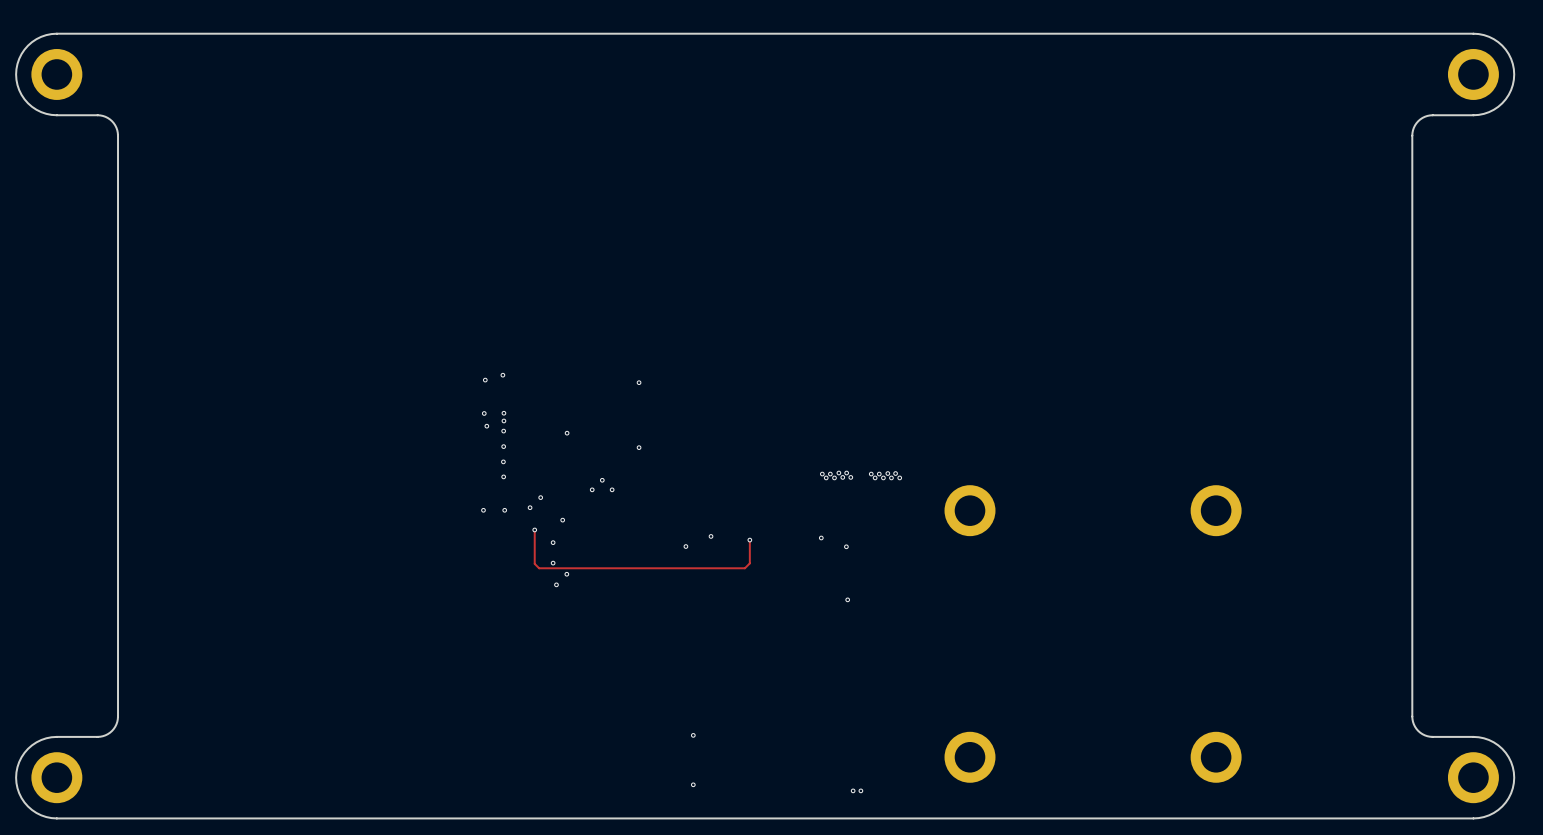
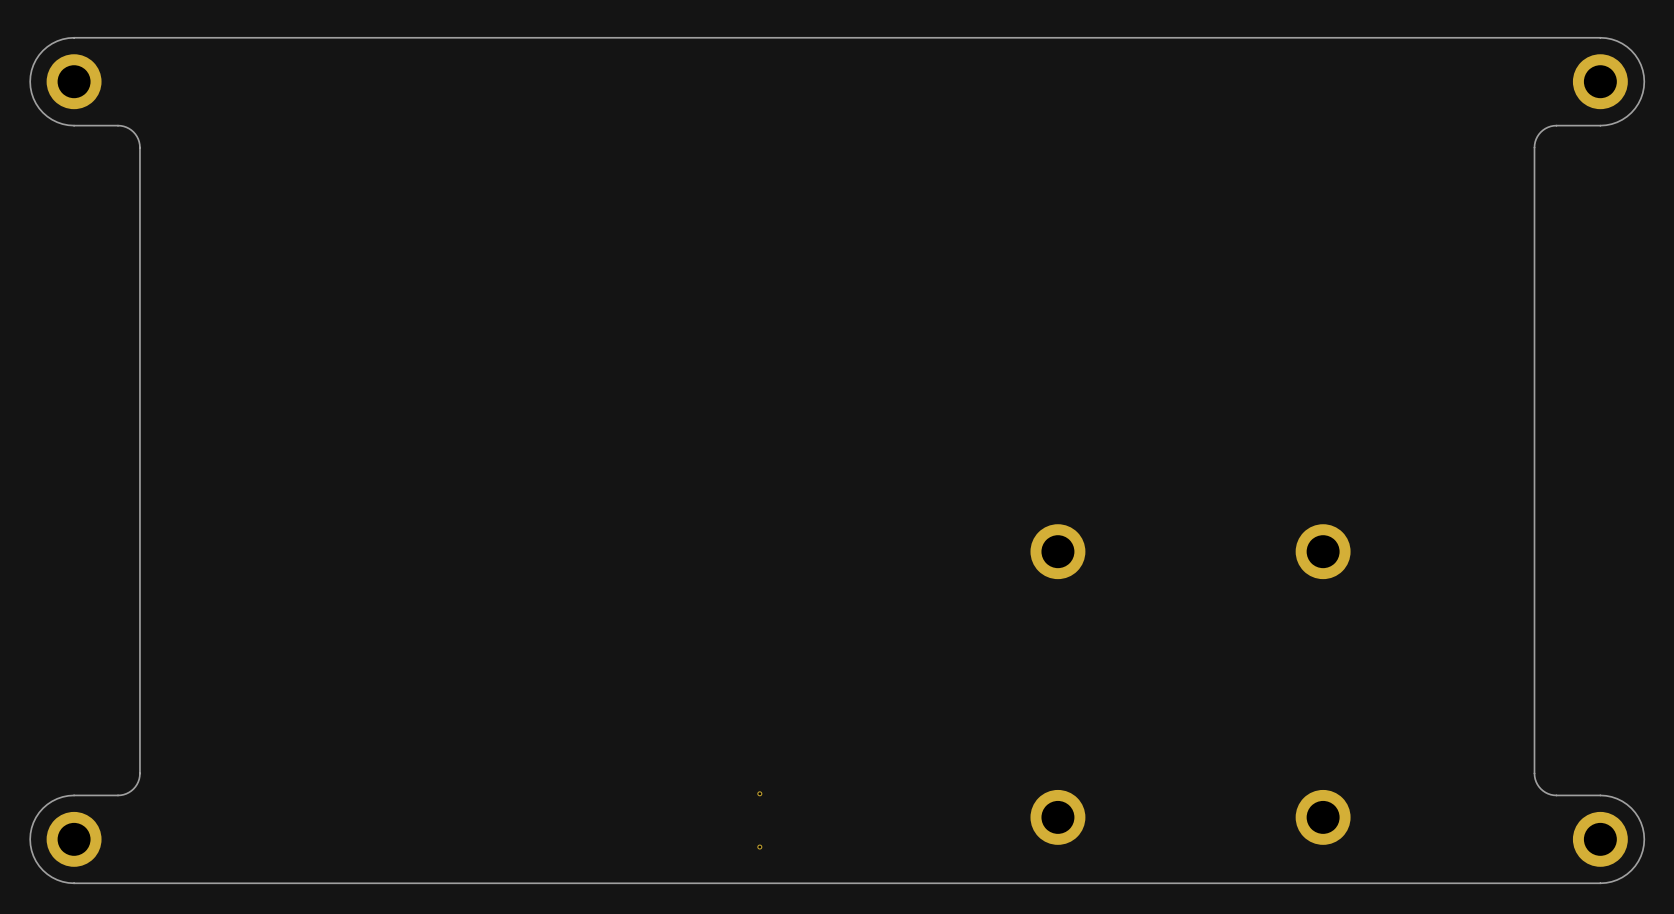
via: (502, 375) -> none
via: (485, 380) -> none
via: (639, 382) -> none
via: (484, 413) -> none
via: (503, 413) -> none
via: (503, 420) -> none
via: (486, 426) -> none
via: (503, 431) -> none
via: (567, 433) -> none
via: (503, 446) -> none
via: (639, 447) -> none
via: (503, 461) -> none
via: (838, 473) -> none
via: (846, 473) -> none
via: (887, 473) -> none
via: (895, 473) -> none
via: (822, 474) -> none
via: (830, 474) -> none
via: (871, 474) -> none
via: (879, 474) -> none
via: (503, 476) -> none
via: (826, 477) -> none
via: (834, 477) -> none
via: (842, 477) -> none
via: (850, 477) -> none
via: (875, 477) -> none
via: (883, 477) -> none
via: (891, 477) -> none
via: (899, 477) -> none
via: (602, 480) -> none
via: (592, 489) -> none
via: (612, 489) -> none
via: (540, 497) -> none
via: (530, 507) -> none
via: (483, 510) -> none
via: (504, 510) -> none
via: (562, 520) -> none
track: (534, 529) (534, 563) (539, 568) (744, 568) (749, 563) (749, 540) -> none
via: (534, 529) -> none
via: (711, 536) -> none
via: (821, 537) -> none
via: (749, 540) -> none
via: (553, 542) -> none
via: (685, 546) -> none
via: (846, 546) -> none
via: (553, 563) -> none
via: (566, 574) -> none
via: (556, 584) -> none
via: (847, 599) -> none
via: (853, 790) -> none
via: (860, 790) -> none

